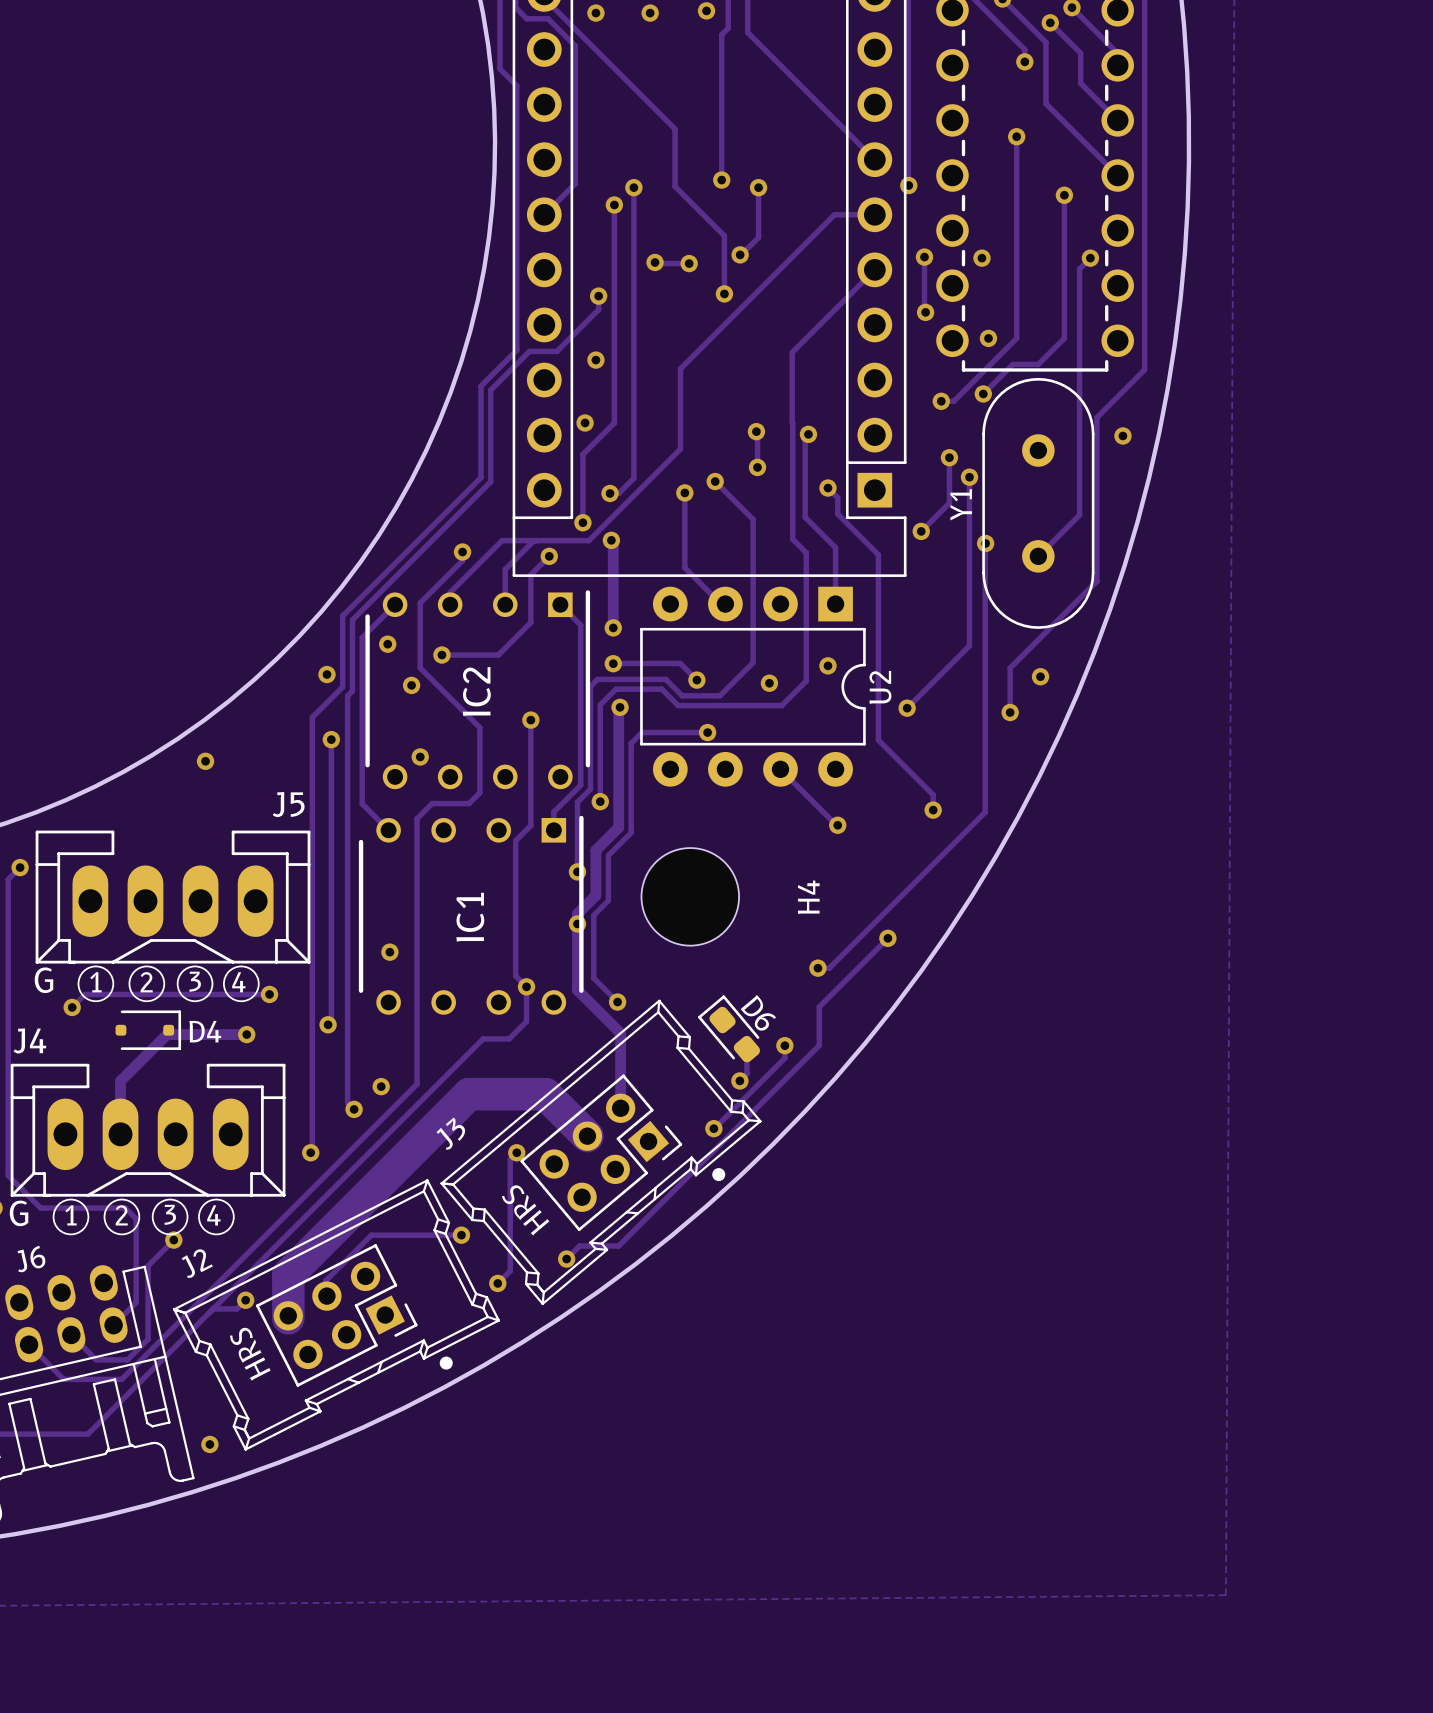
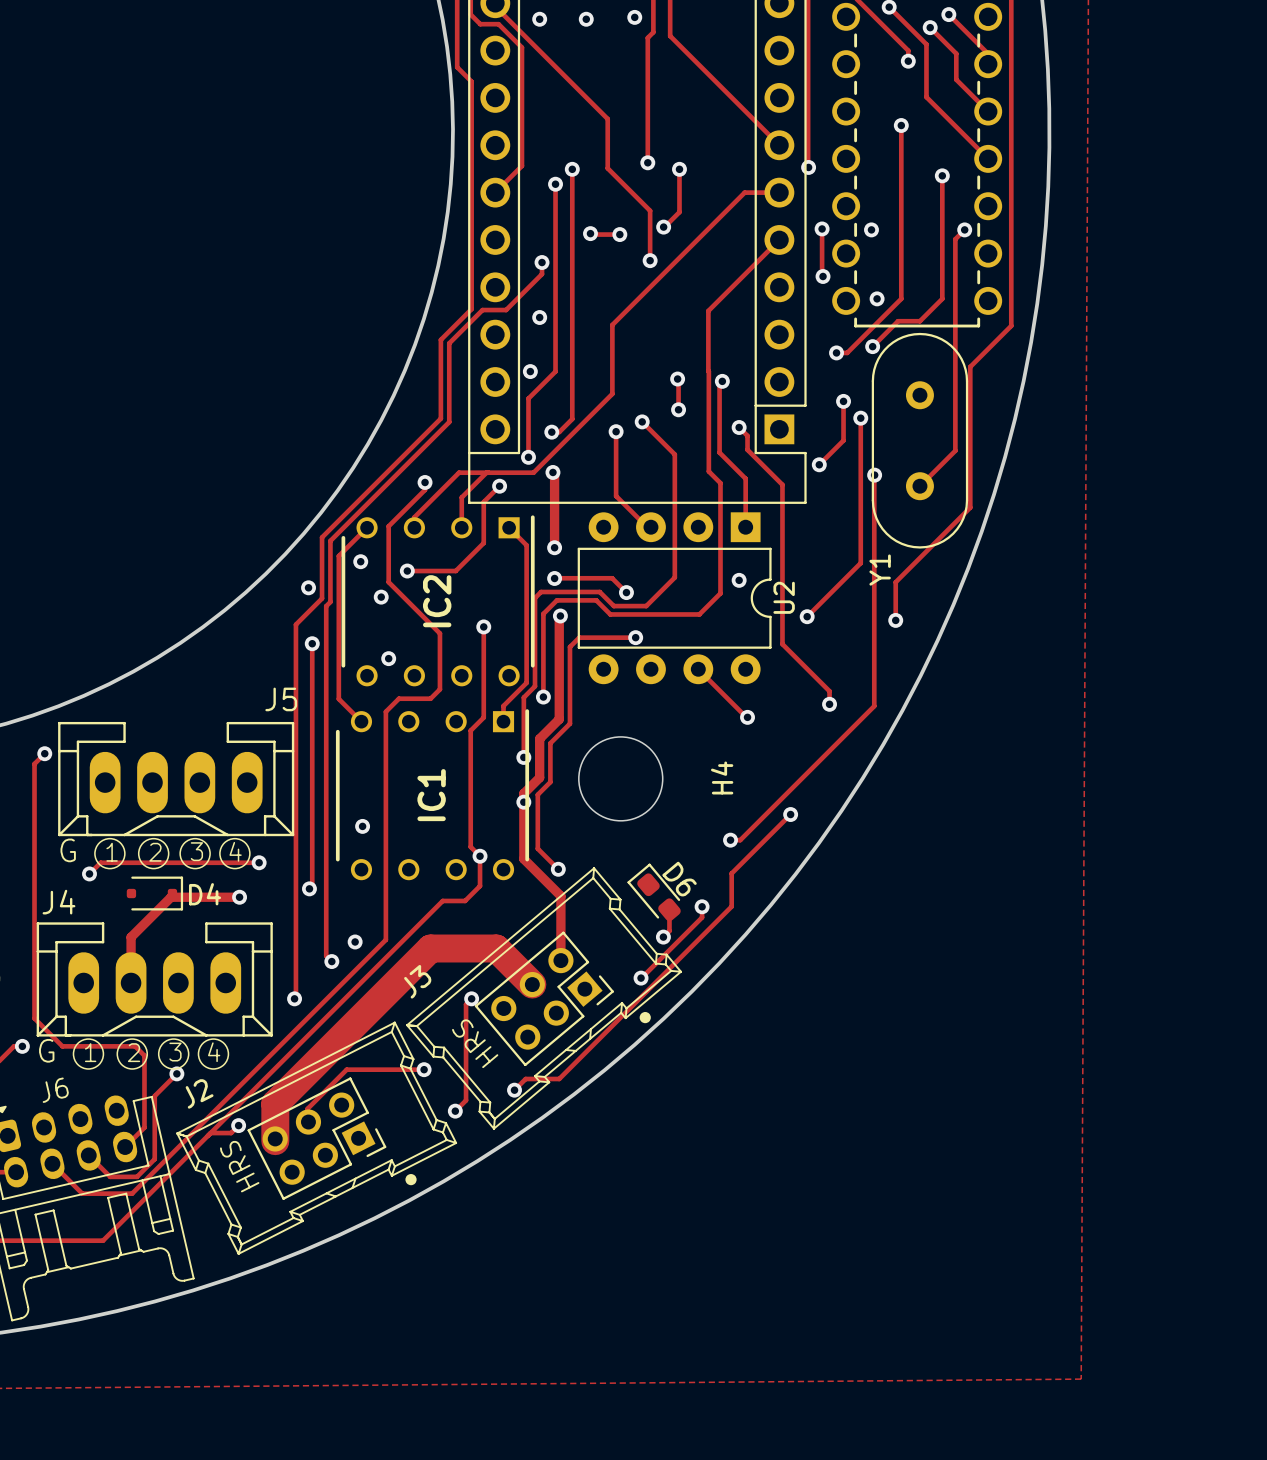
via: (1122, 435) -> none
Y1 name position: Y1 (961, 504) -> Y1 (880, 570)
via: (1040, 676) -> none
via: (769, 683) -> none
via: (205, 761) -> none
via: (209, 1444) -> none

